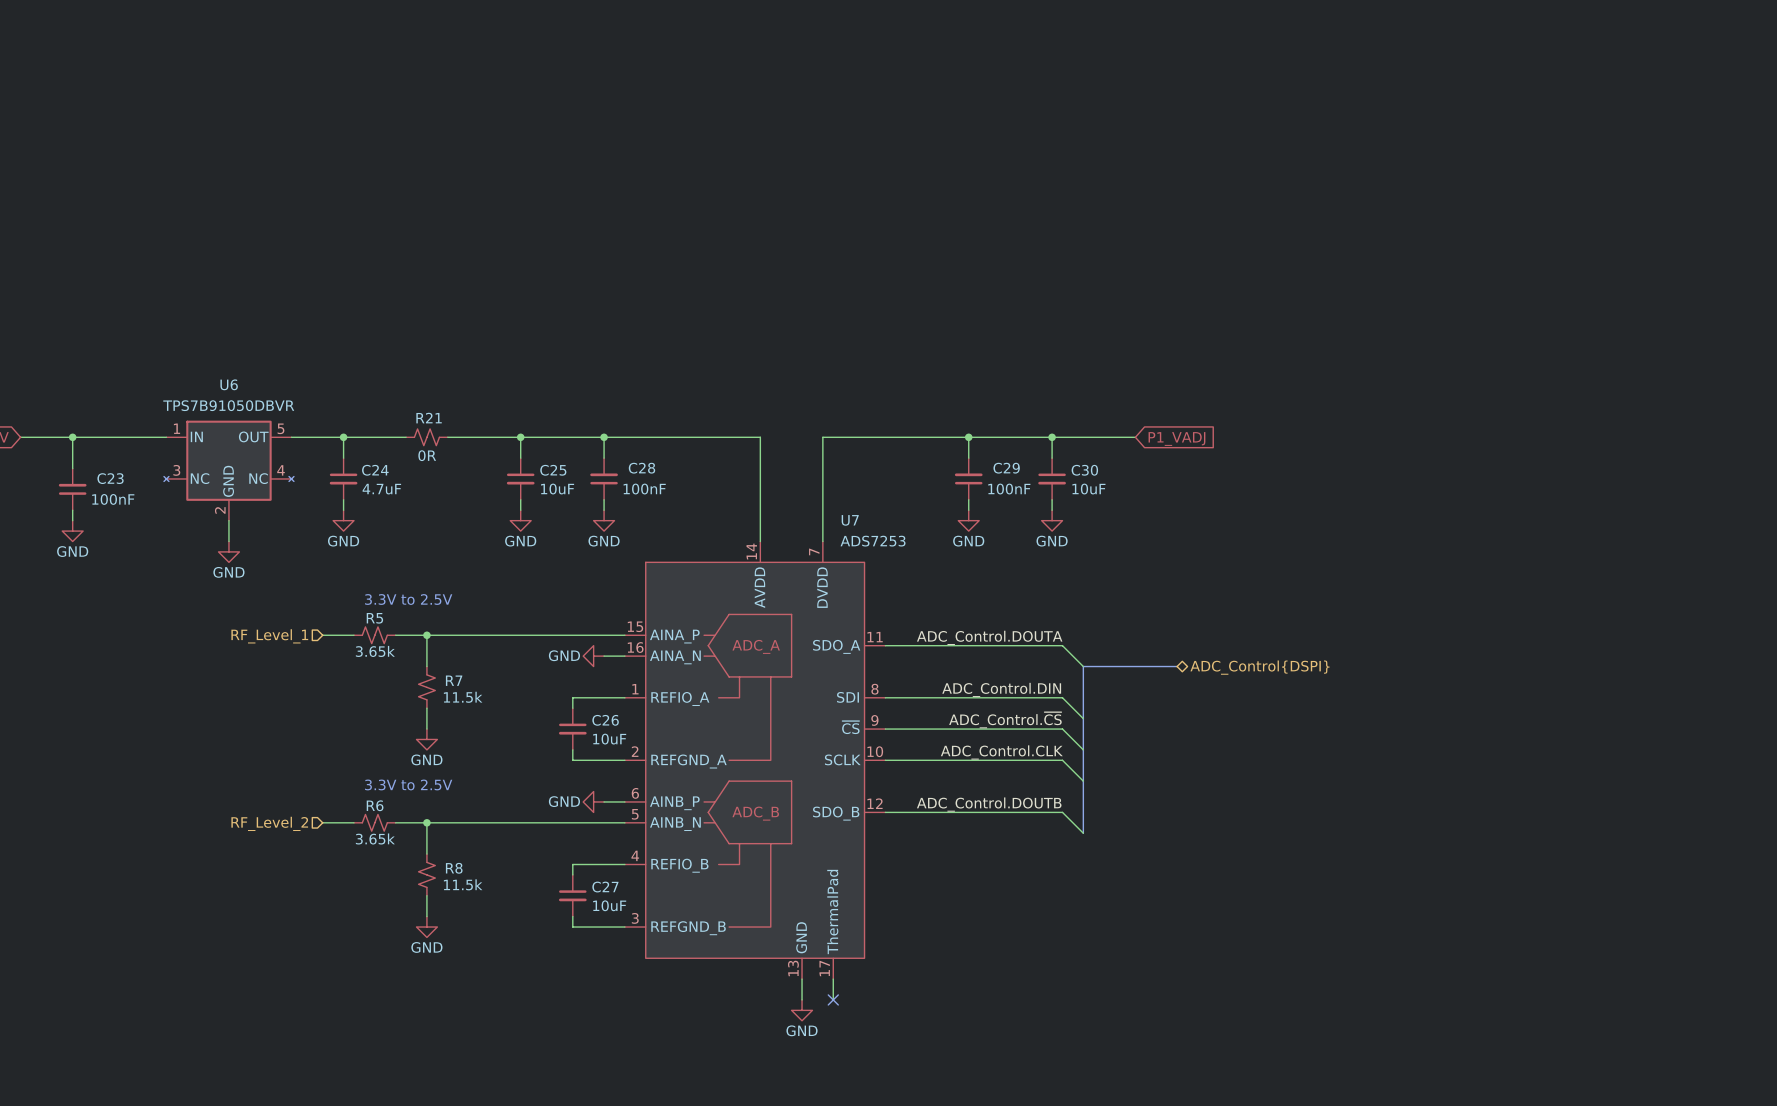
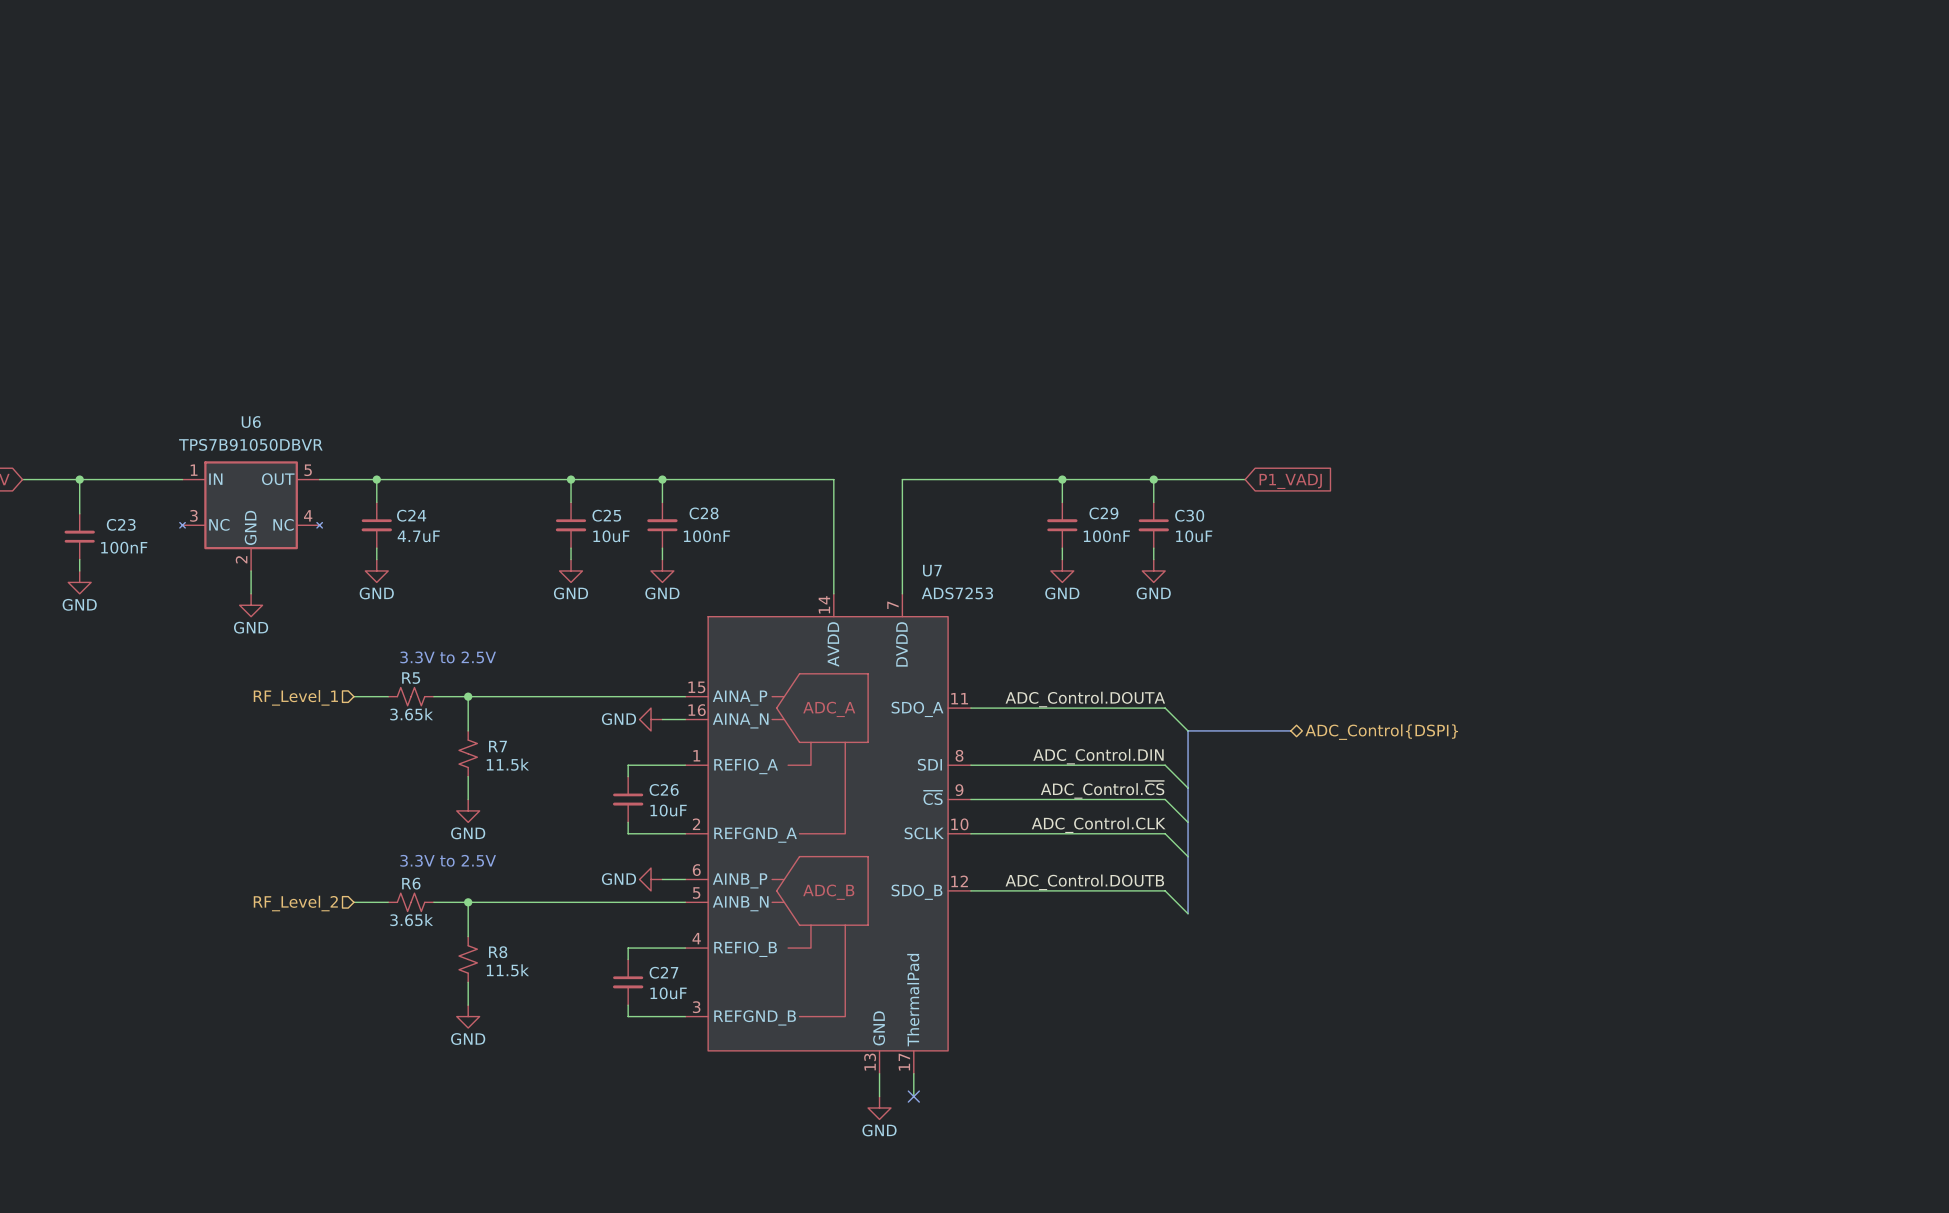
R21: 0R (426, 437) -> none

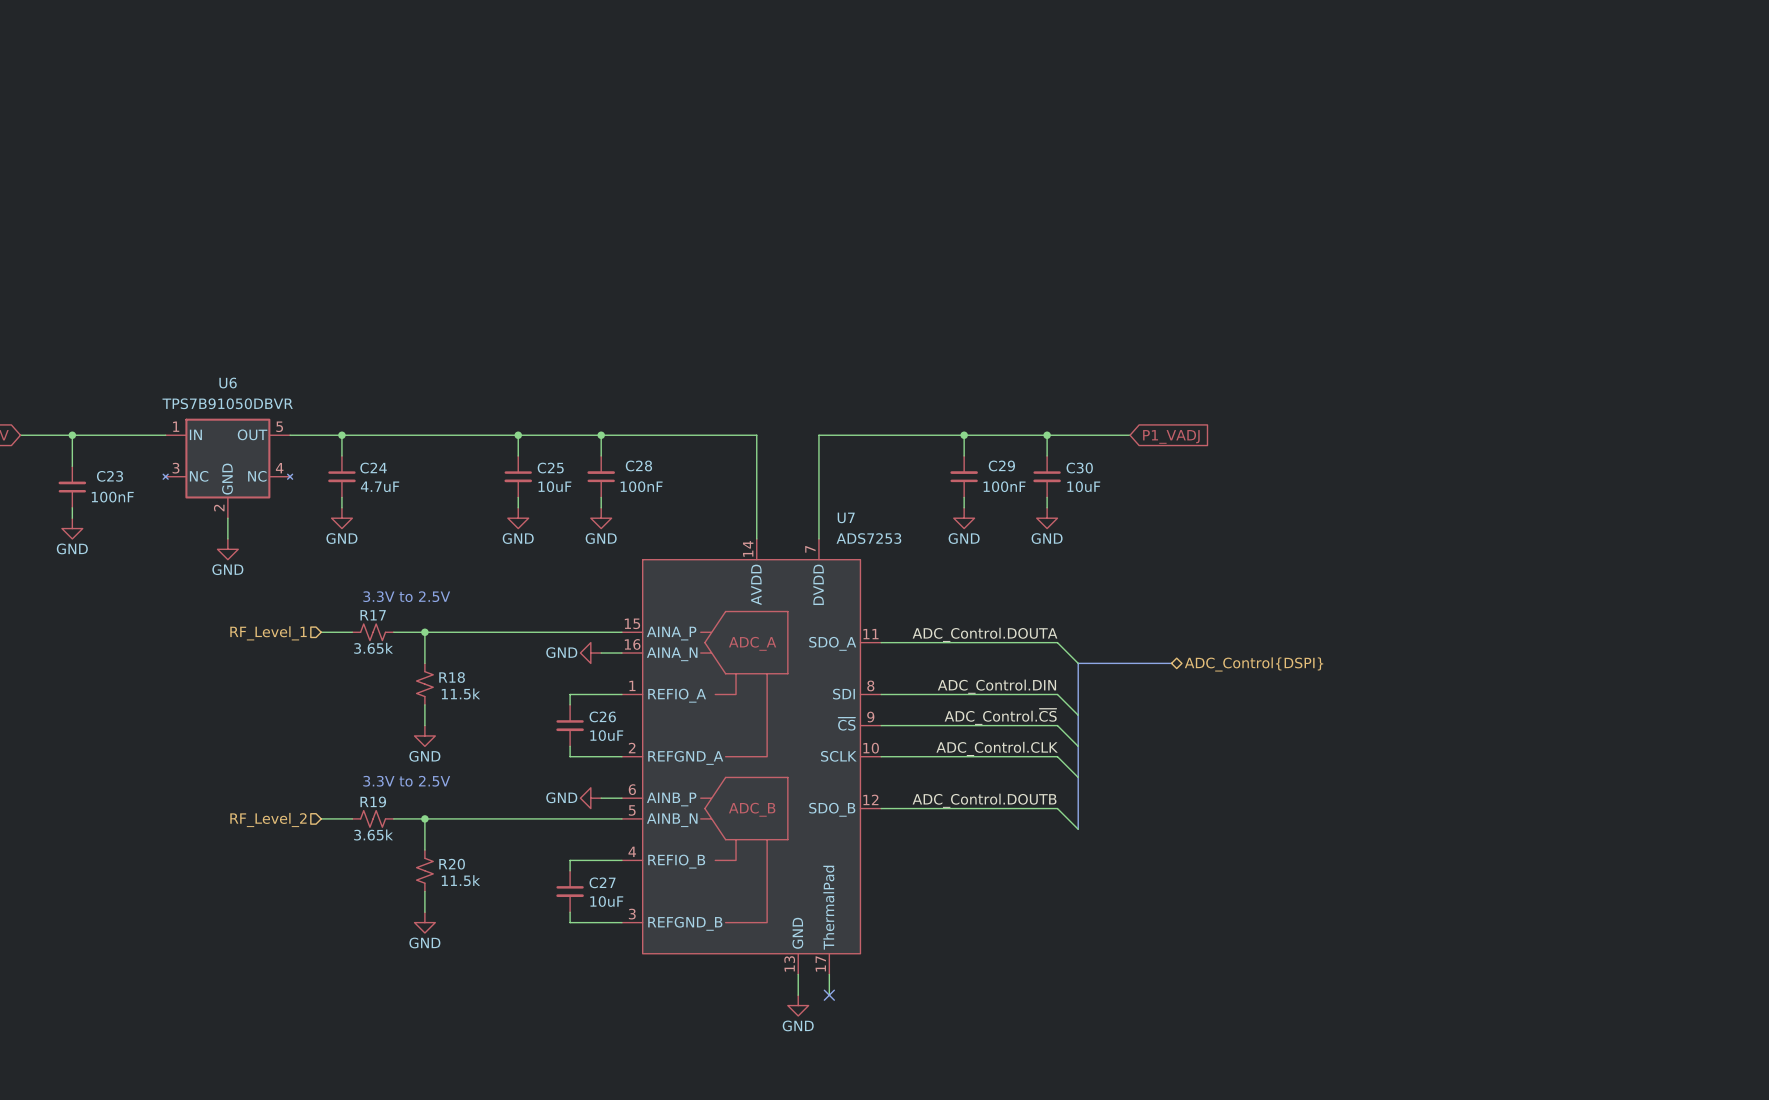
R5 name: R5 (411, 678) -> R17 (373, 615)
R7 name: R7 (497, 746) -> R18 (452, 677)
R6 name: R6 (411, 883) -> R19 (373, 801)
R8 name: R8 (498, 952) -> R20 (452, 864)

